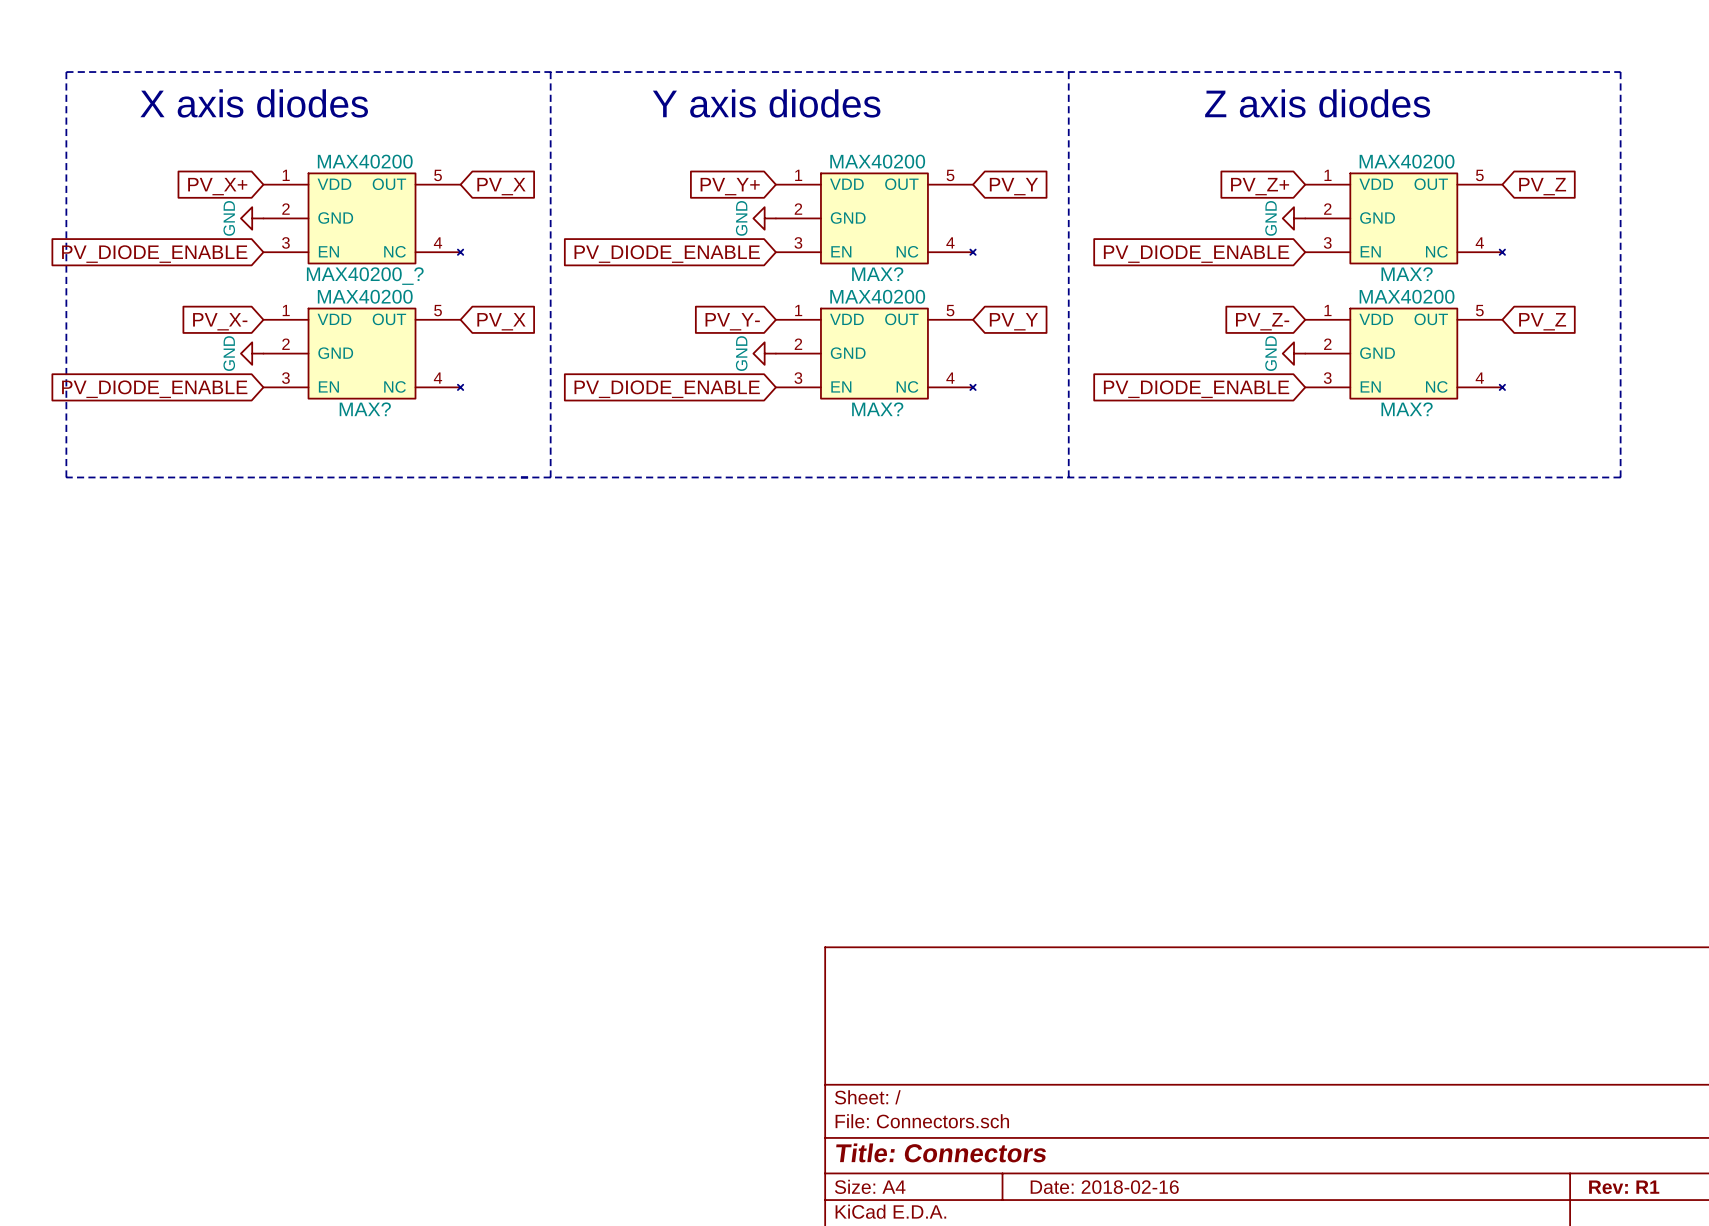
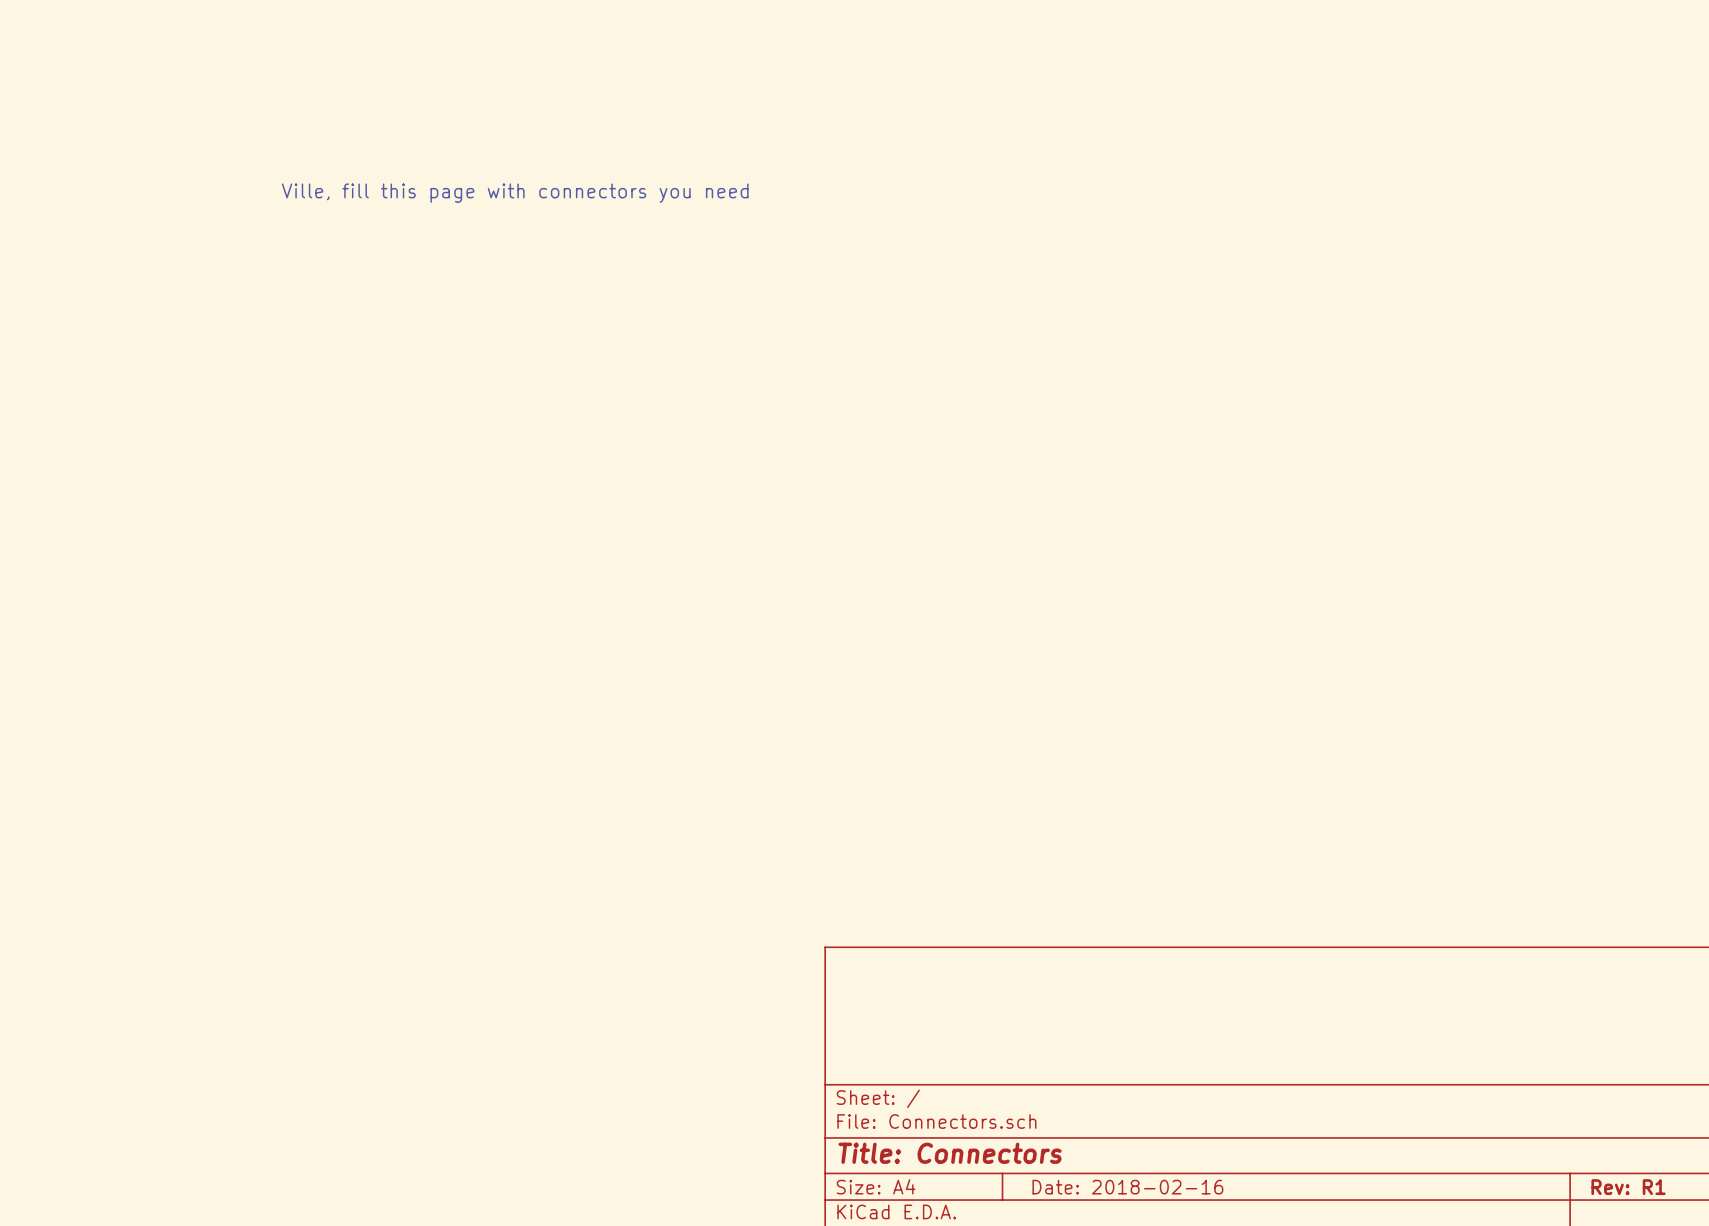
line: (66, 72) (1620, 72) (1620, 477) (66, 477) (66, 72) -> none
line: (550, 72) (550, 477) -> none
line: (1068, 72) (1068, 477) -> none
text: X axis diodes (254, 103) -> none
text: Y axis diodes (766, 103) -> none
text: Z axis diodes (1317, 103) -> none
global label: PV_X+ (217, 186) -> none
global label: PV_X (501, 186) -> none
global label: PV_Y+ (730, 186) -> none
global label: PV_Y (1013, 186) -> none
global label: PV_Z+ (1260, 186) -> none
global label: PV_Z (1542, 186) -> none
text: none -> Ville, fill this page with connectors you need (515, 193)
power symbol: GND (252, 218) -> none
MAX40200_?: MAX40200 (363, 218) -> none
power symbol: GND (764, 218) -> none
MAX?: MAX40200 (875, 218) -> none
power symbol: GND (1294, 218) -> none
MAX?: MAX40200 (1405, 218) -> none
global label: PV_DIODE_ENABLE (154, 254) -> none
global label: PV_DIODE_ENABLE (667, 254) -> none
global label: PV_DIODE_ENABLE (1196, 254) -> none
global label: PV_X- (220, 321) -> none
global label: PV_X (501, 321) -> none
global label: PV_Y- (732, 321) -> none
global label: PV_Y (1013, 321) -> none
global label: PV_Z- (1262, 321) -> none
global label: PV_Z (1542, 321) -> none
power symbol: GND (252, 353) -> none
MAX?: MAX40200 (363, 353) -> none
power symbol: GND (764, 353) -> none
MAX?: MAX40200 (875, 353) -> none
power symbol: GND (1294, 353) -> none
MAX?: MAX40200 (1405, 353) -> none
global label: PV_DIODE_ENABLE (154, 389) -> none
global label: PV_DIODE_ENABLE (667, 389) -> none
global label: PV_DIODE_ENABLE (1196, 389) -> none

